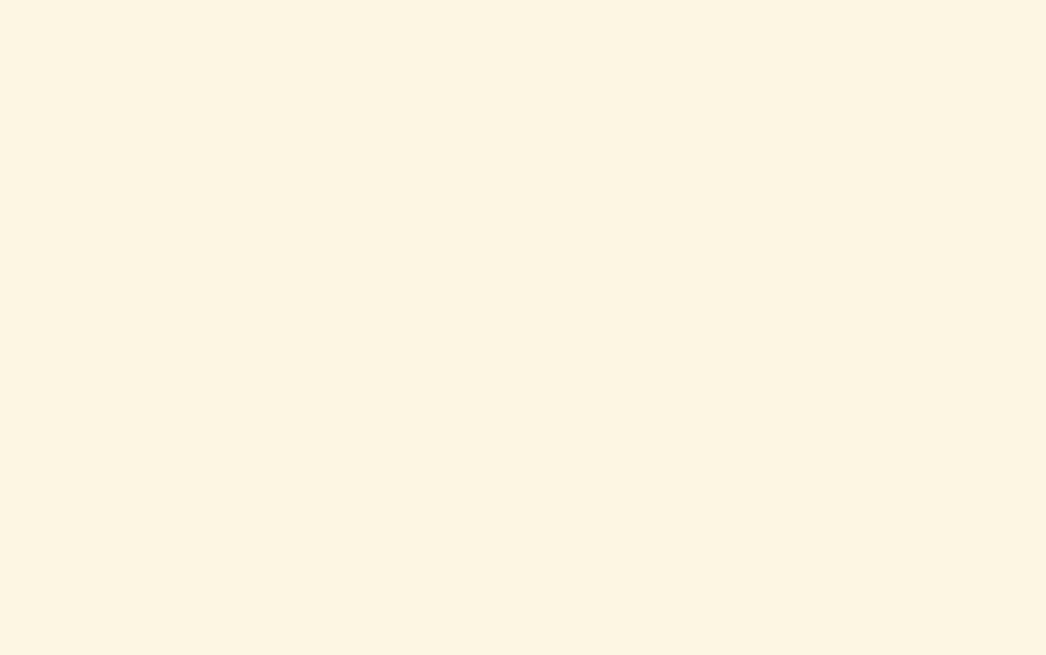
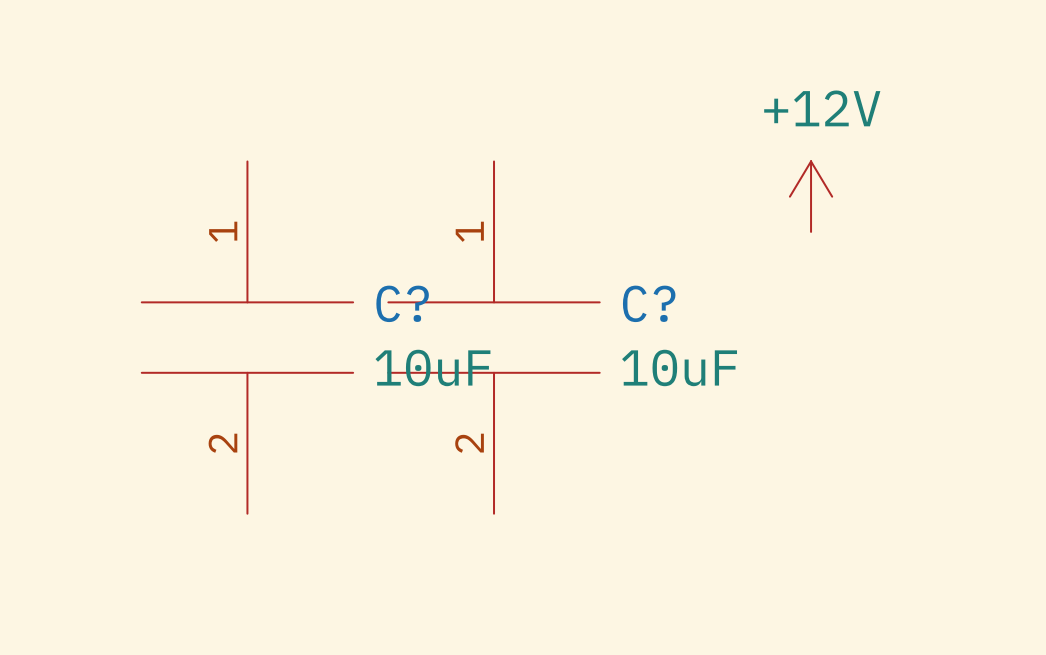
power symbol: none -> +12V (811, 196)
C?: none -> 10uF (247, 337)
C?: none -> 10uF (494, 337)

